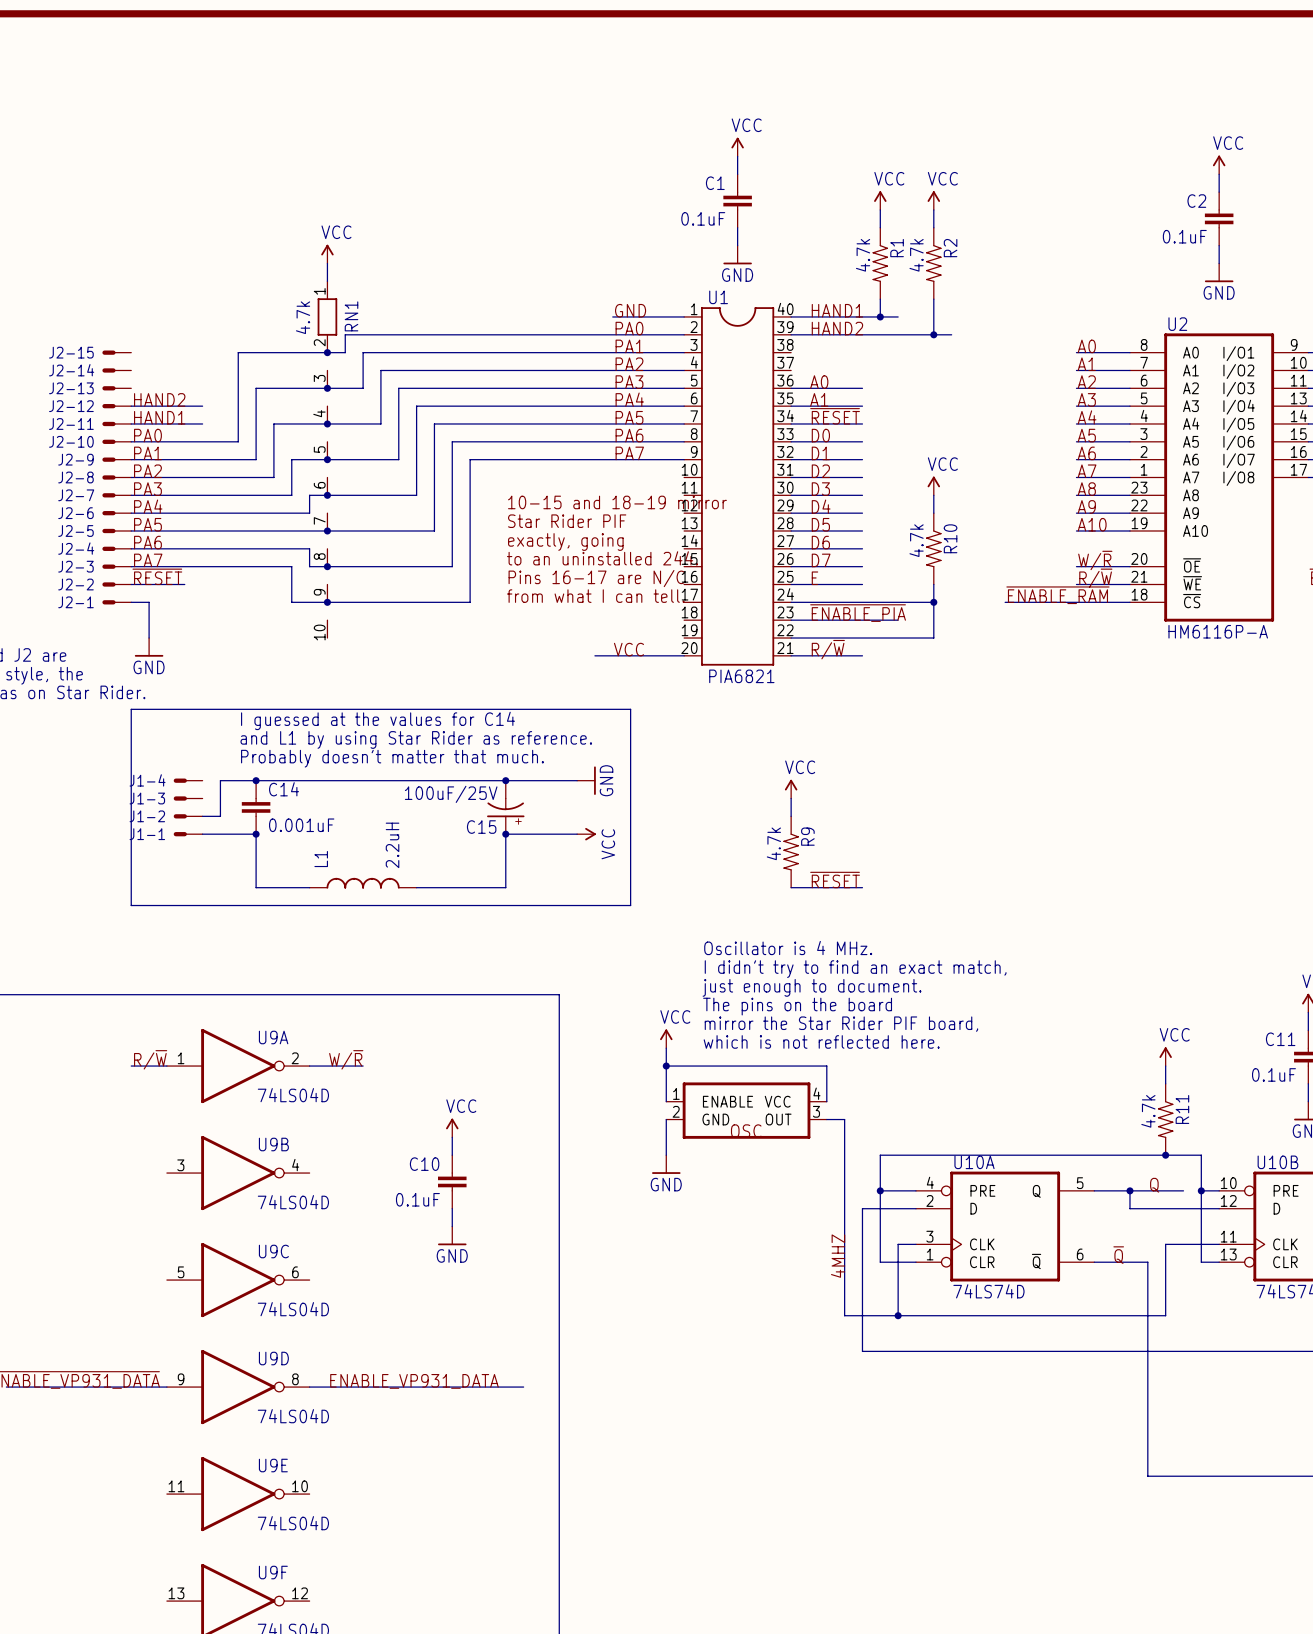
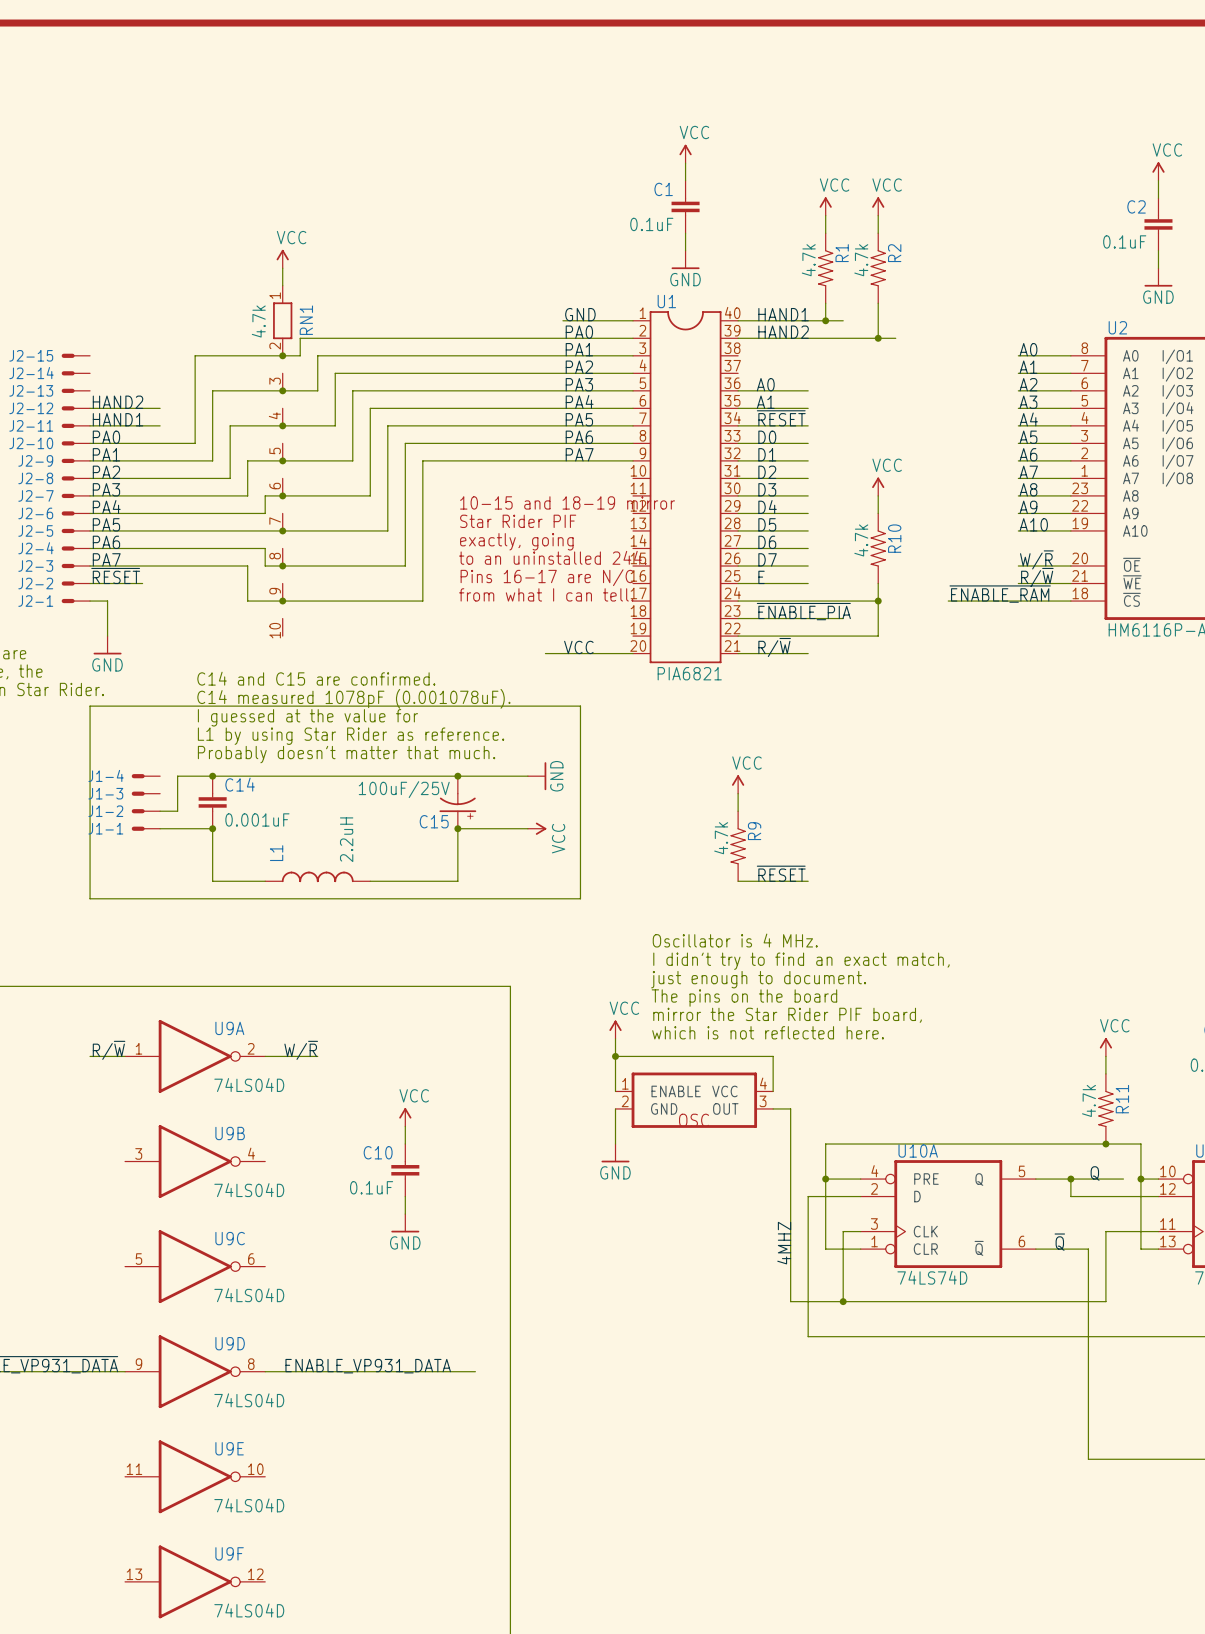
text: none -> C14 and C15 are confirmed. (316, 678)
text: none -> C14 measured 1078pF (0.001078uF). (353, 698)
text: I guessed at the values for C14 (378, 720) -> I guessed at the value for (307, 717)
text: and L1 by using Star Rider as reference. (416, 739) -> L1 by using Star Rider as reference. (351, 736)

